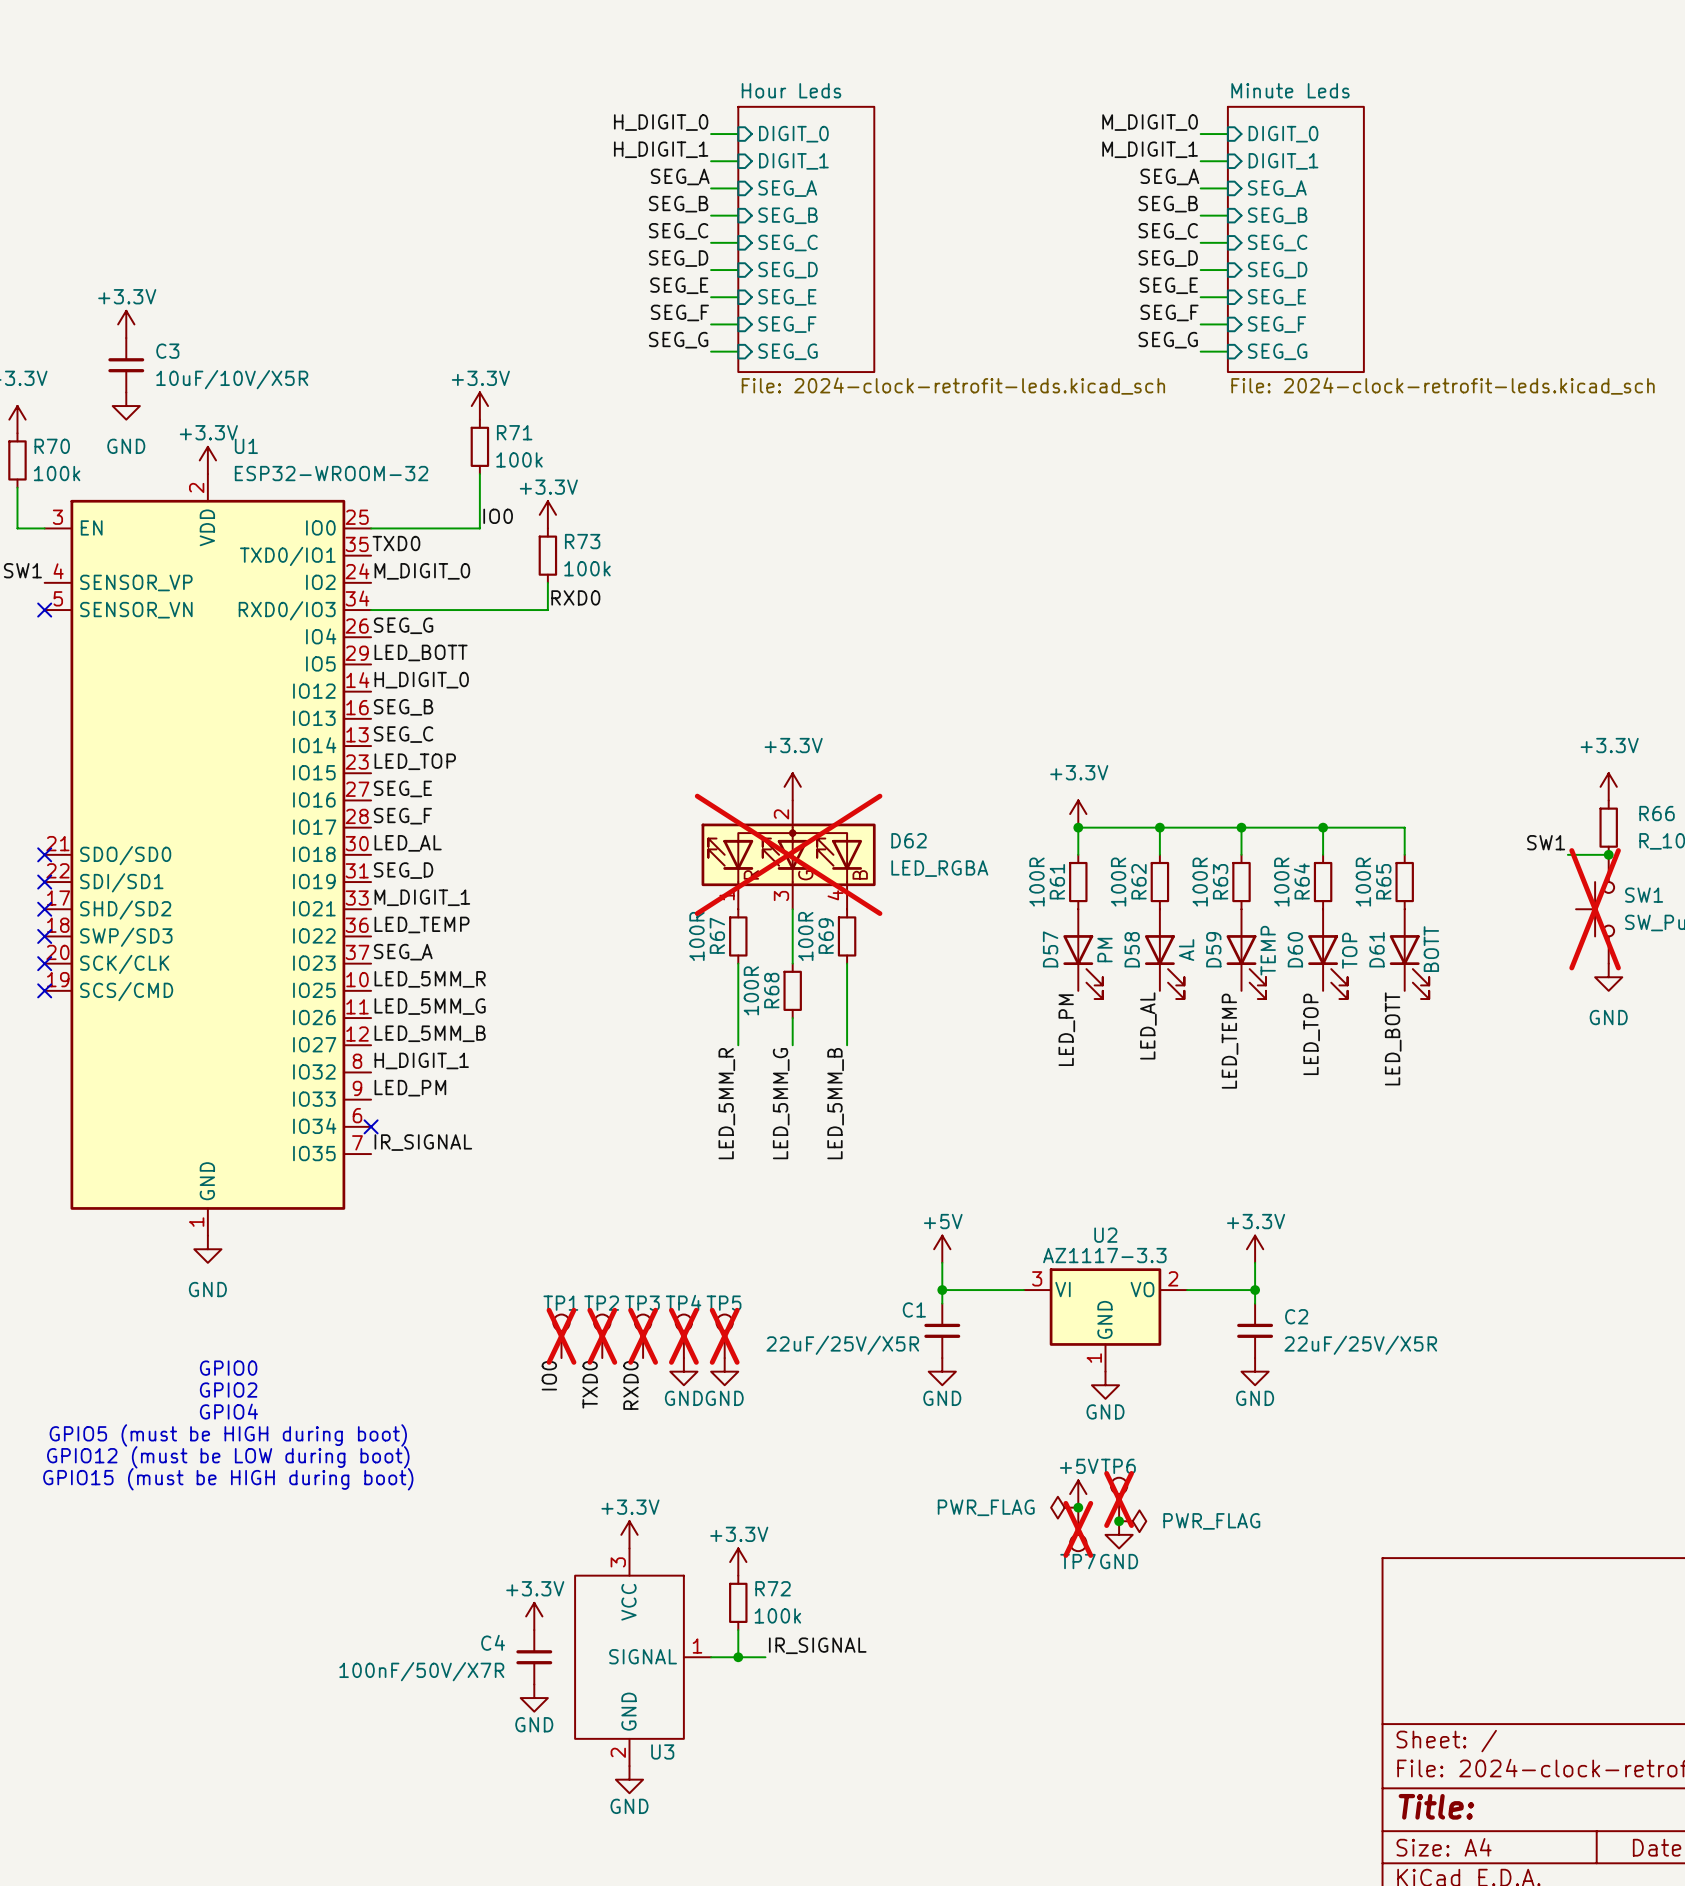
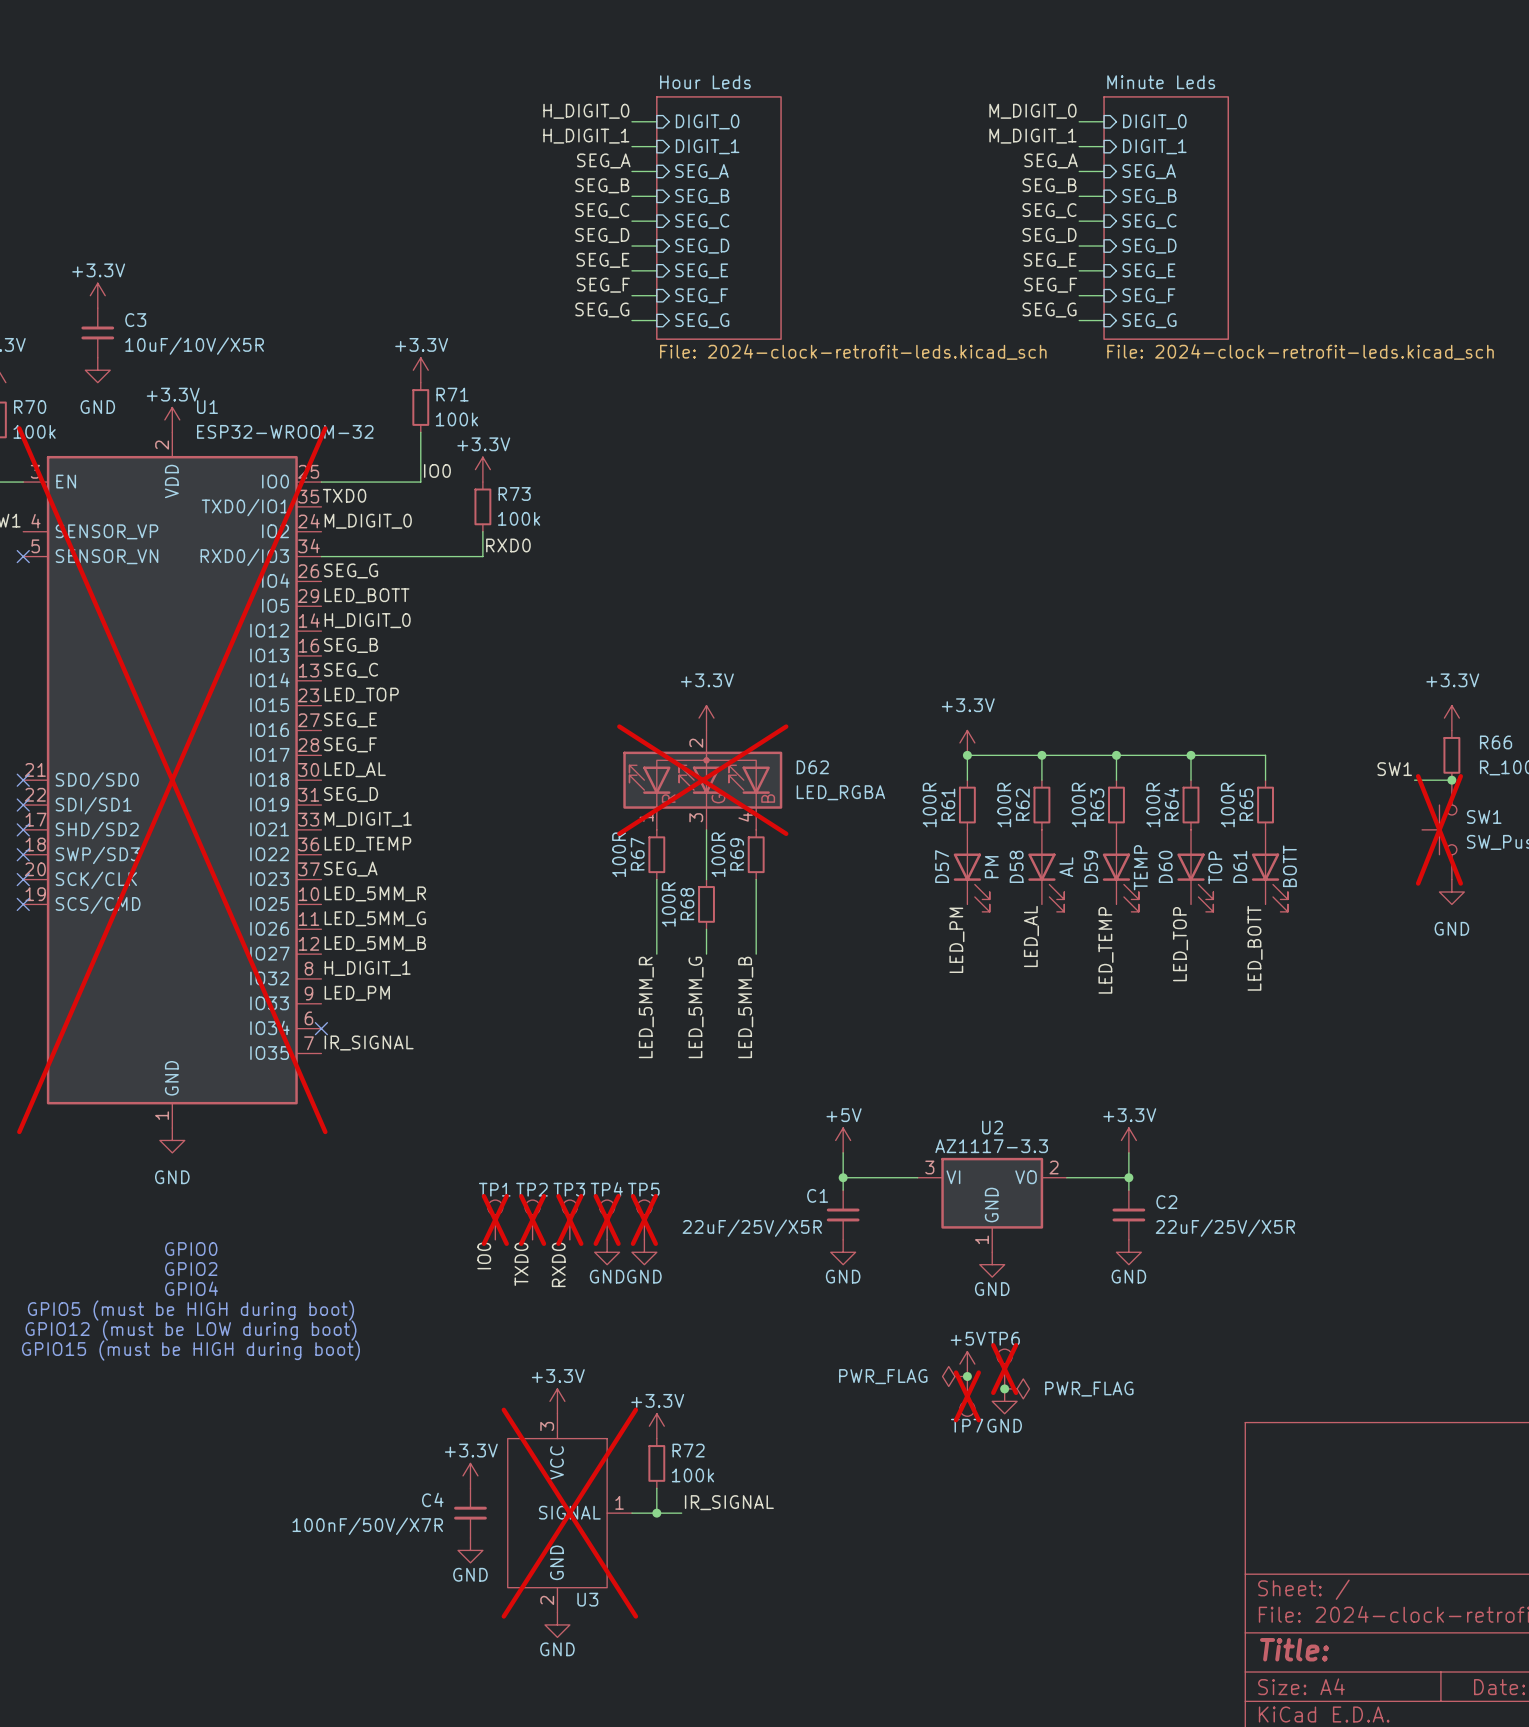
U1 do-not-place cross: none -> (172, 780)
U3 do-not-place cross: none -> (569, 1513)

